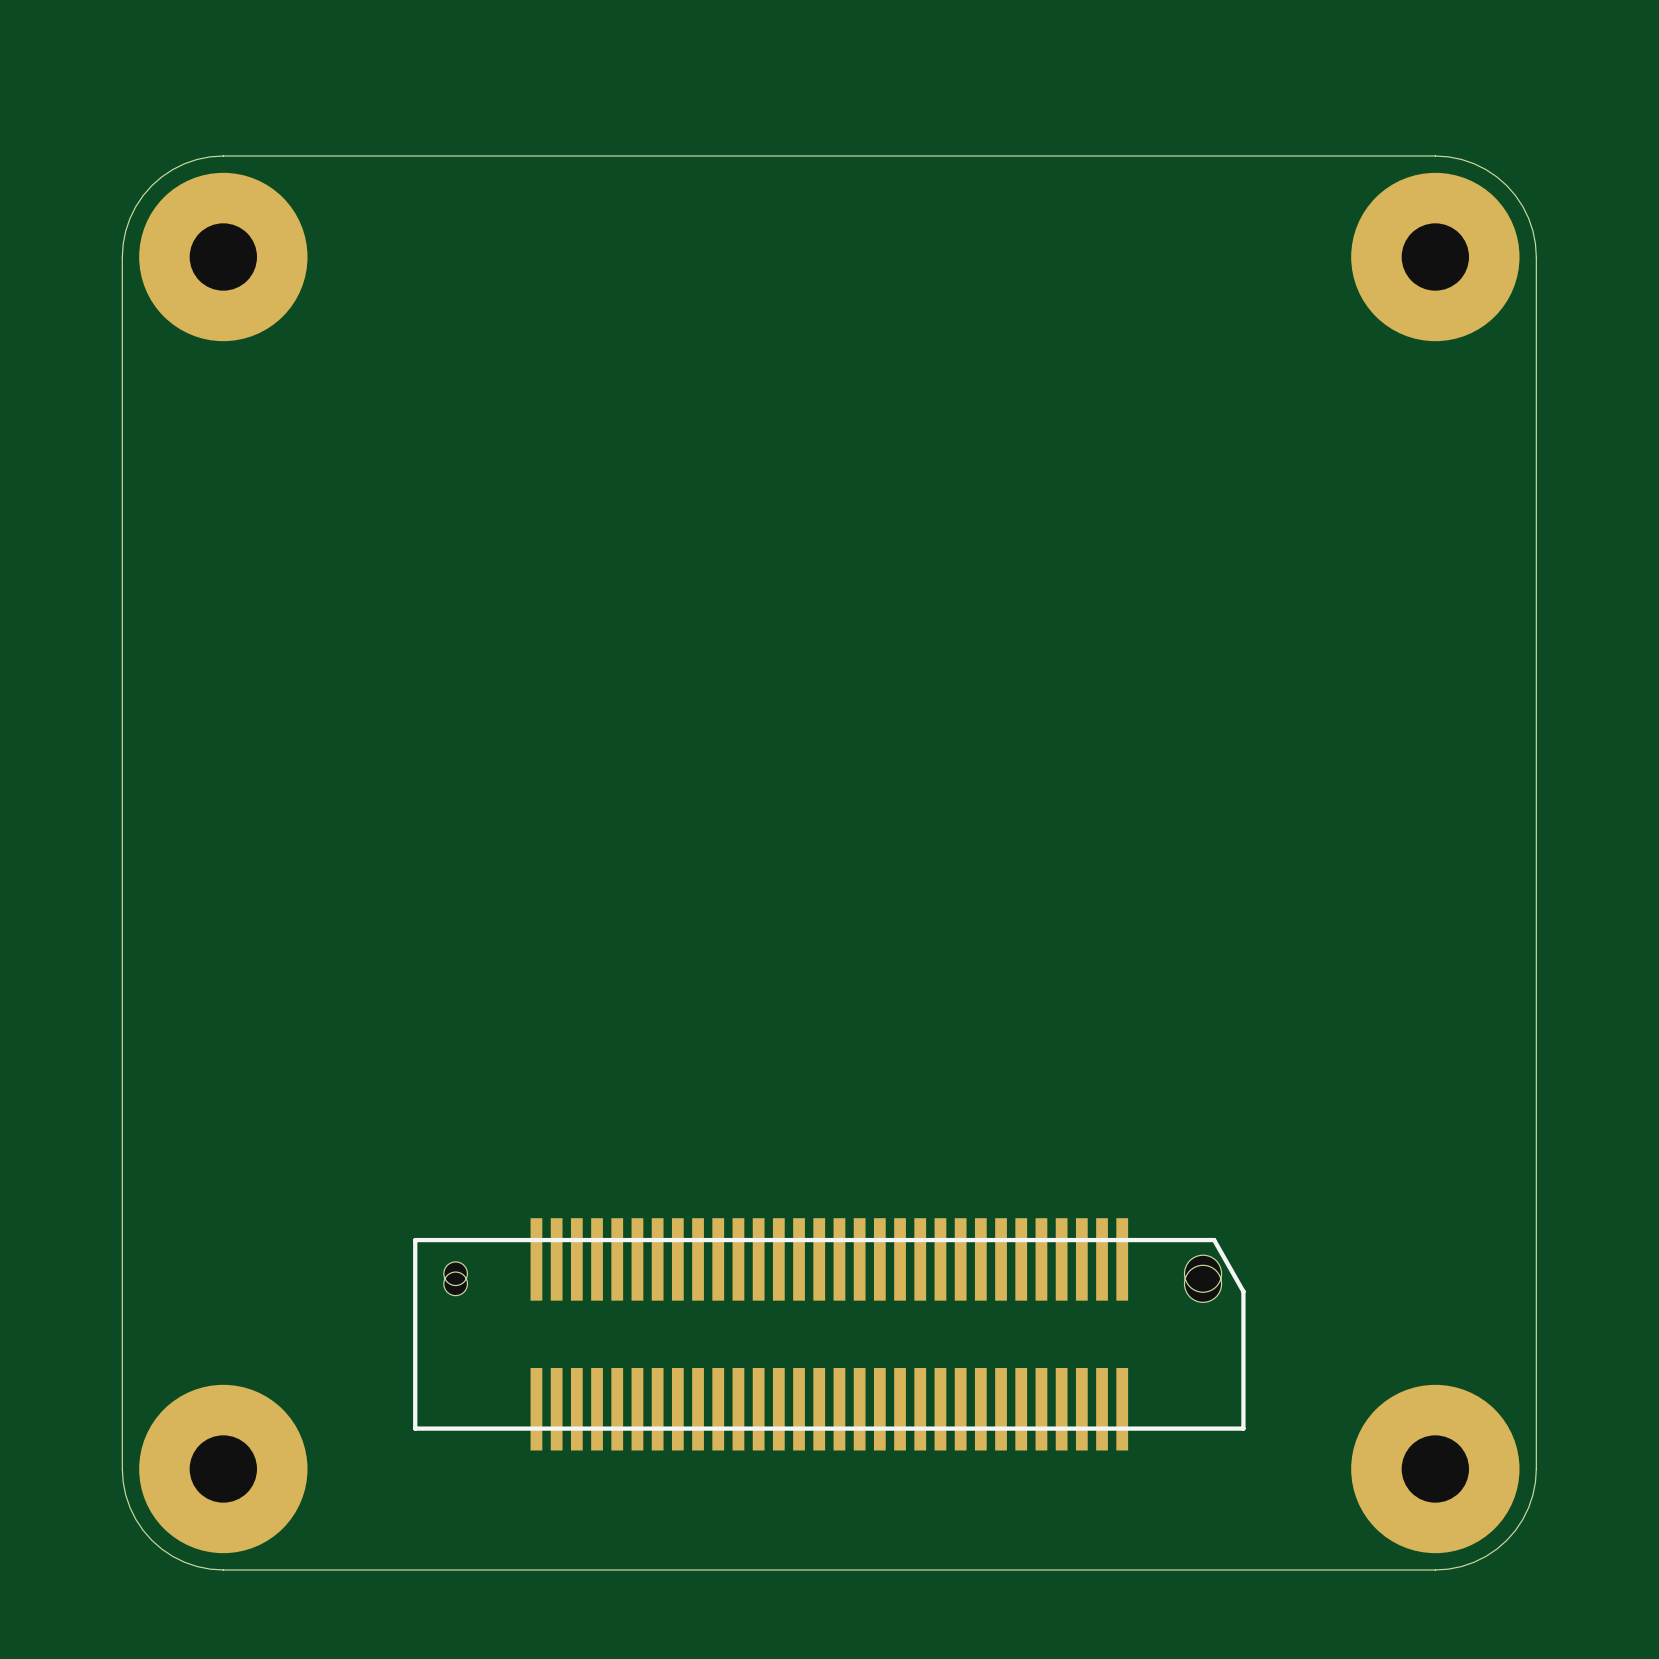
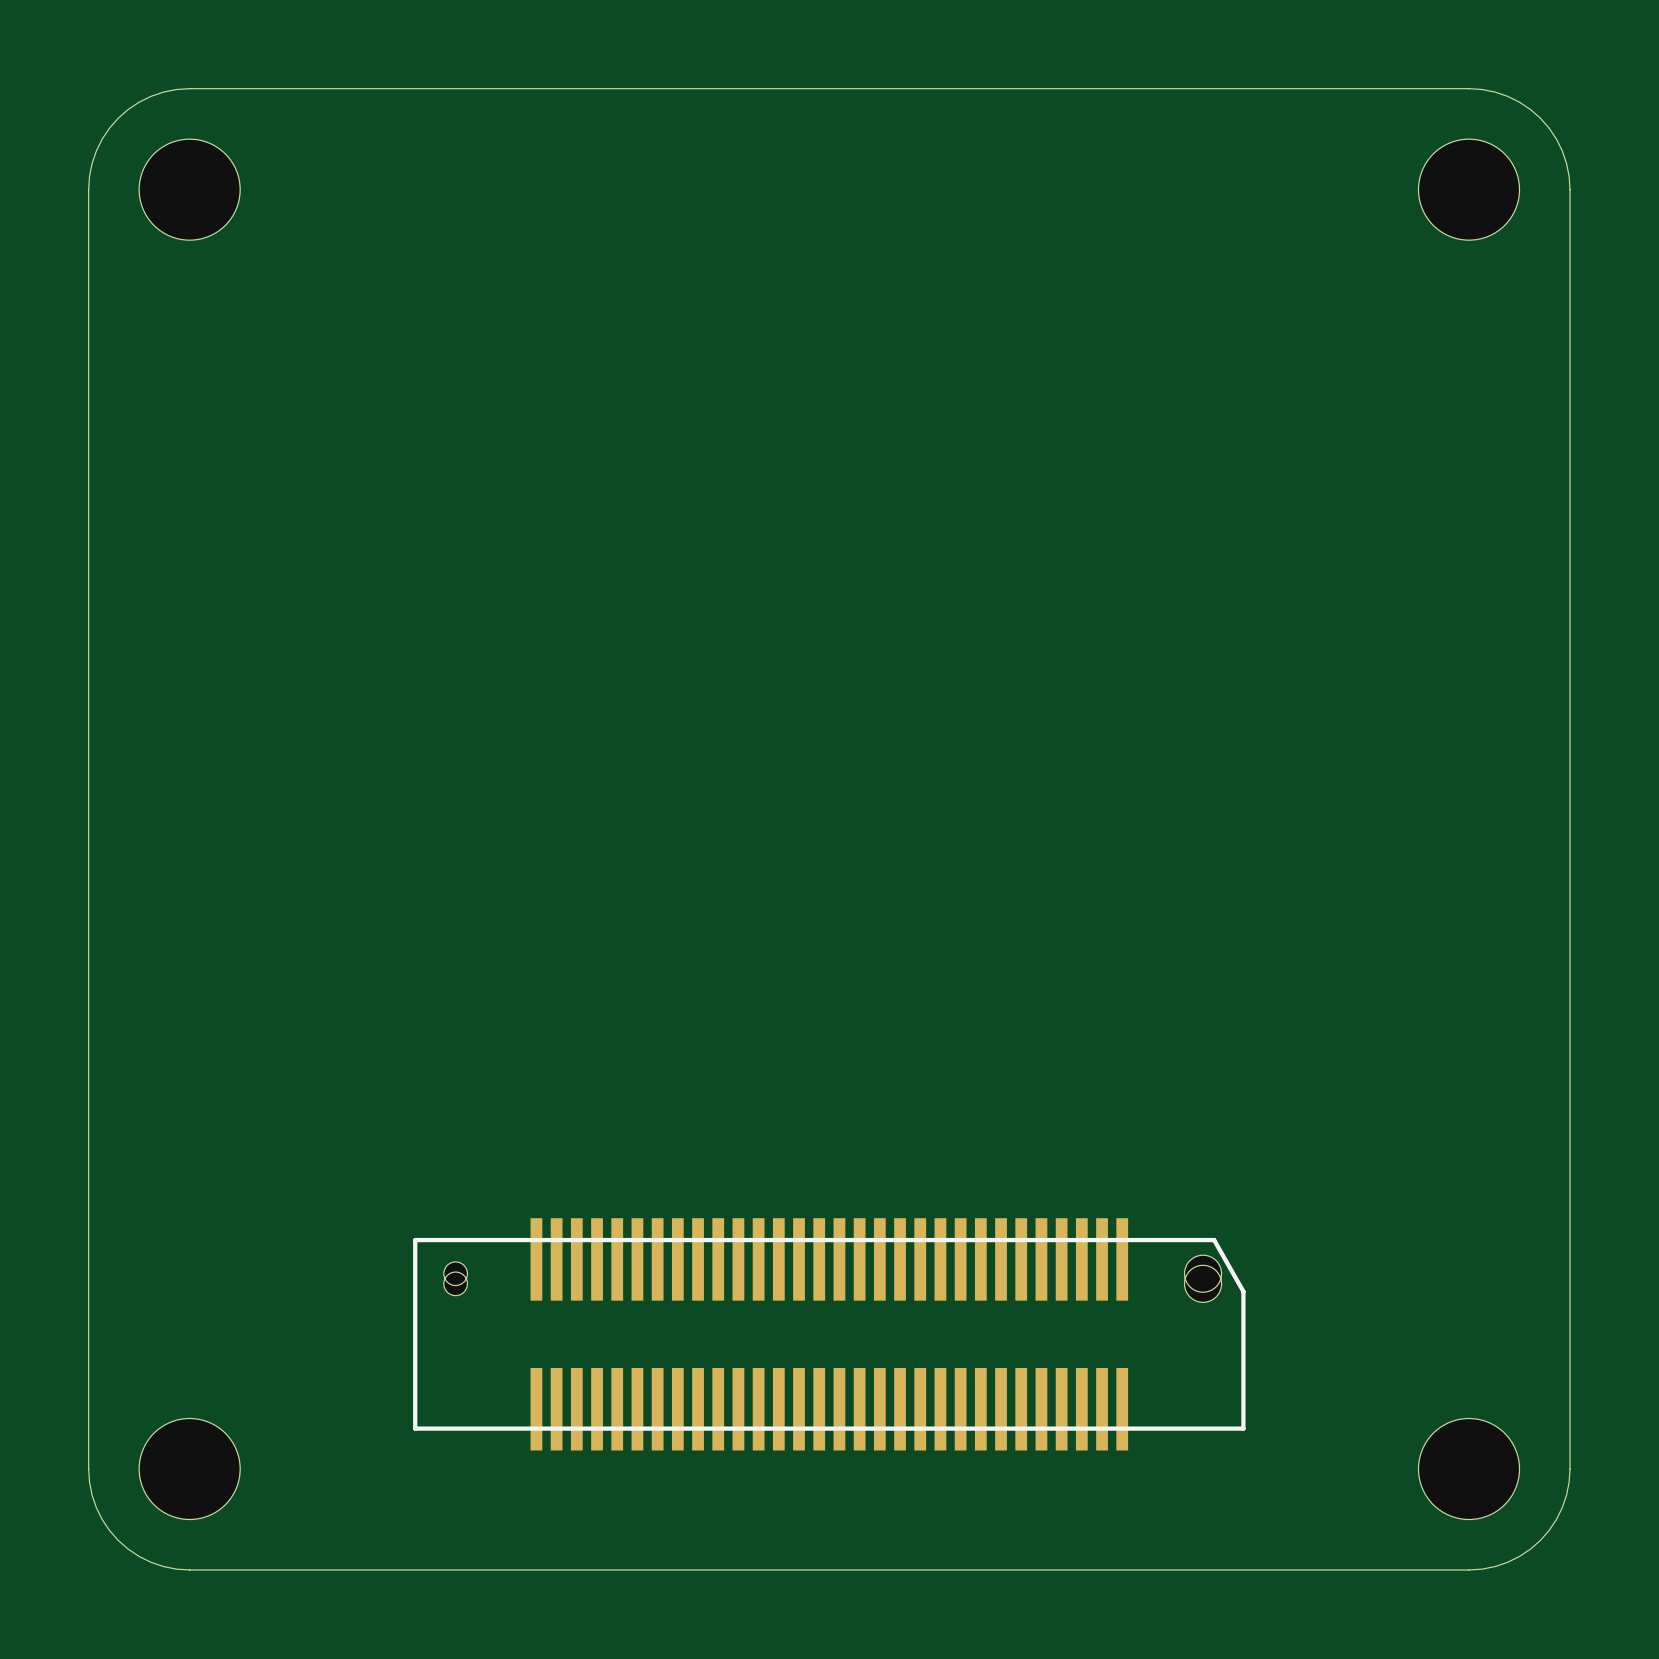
part footprint: [122, 156, 1537, 1571] -> [88, 88, 1571, 1571]

